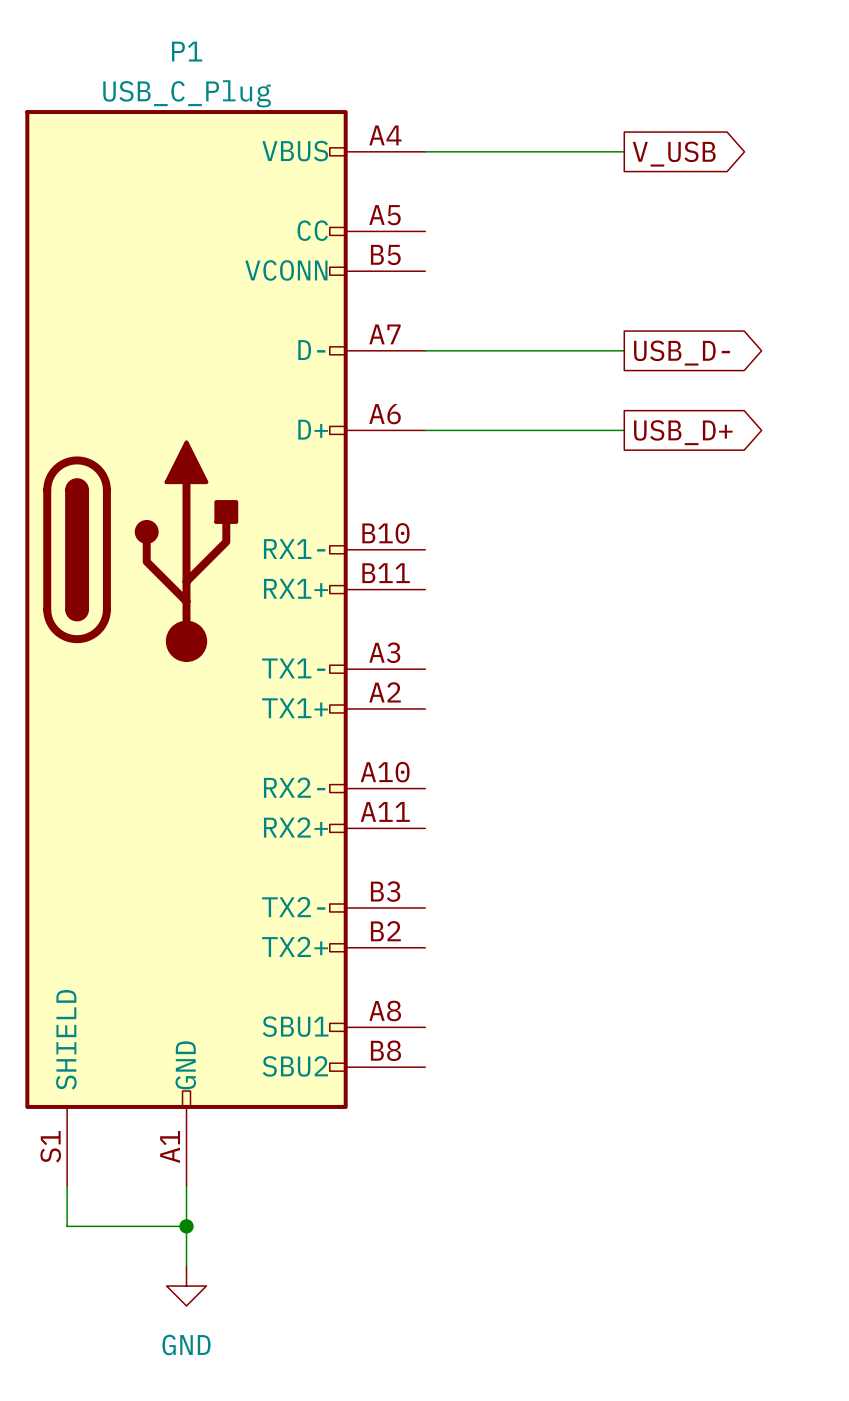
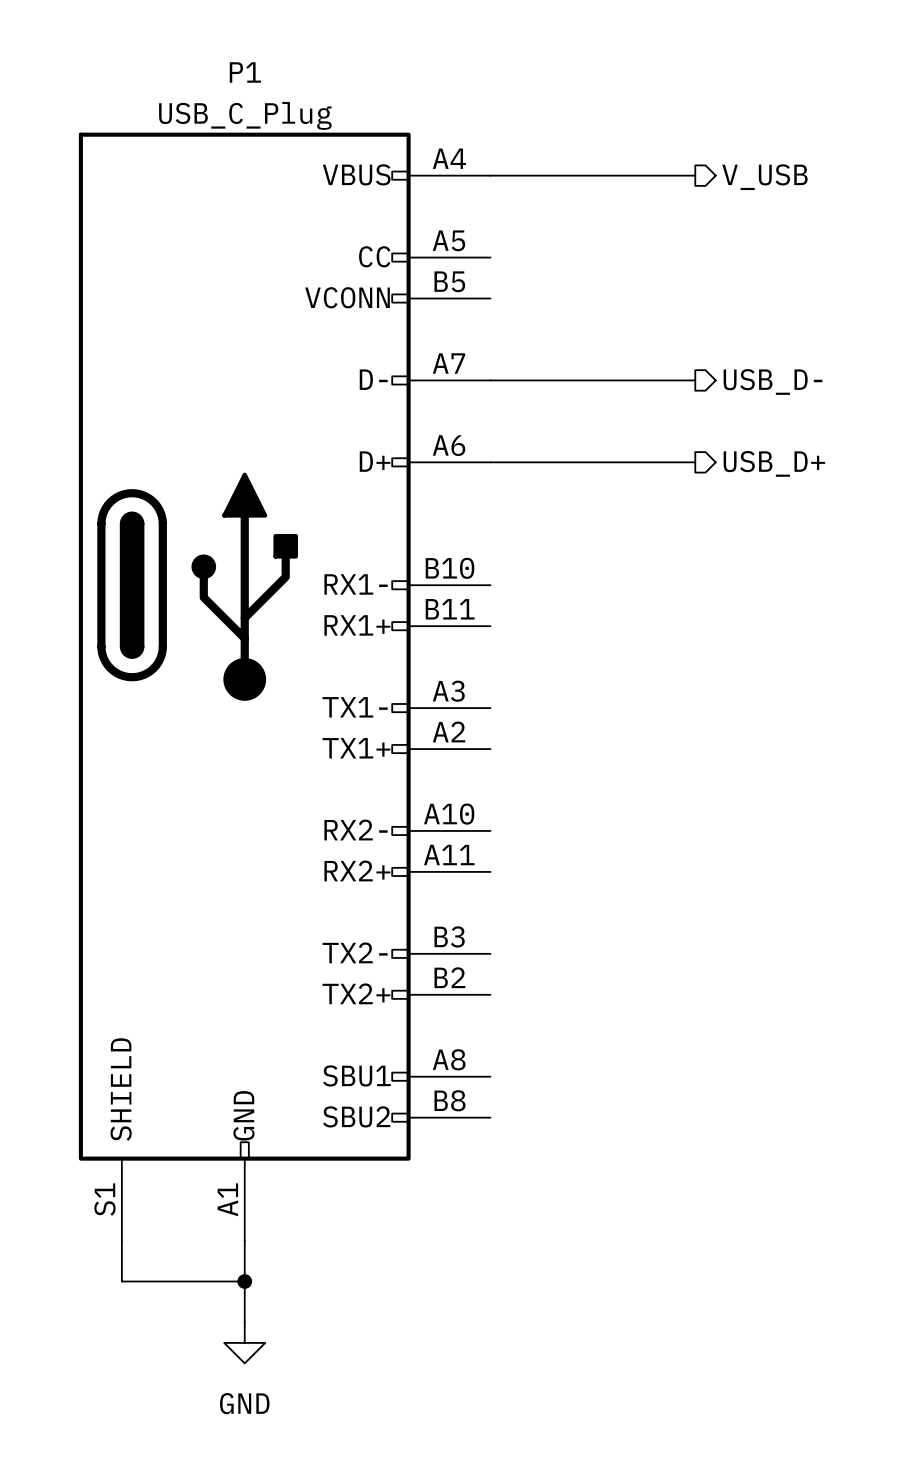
hierarchical label: none -> V_USB (764, 177)
global label: V_USB (674, 154) -> none
hierarchical label: none -> USB_D- (773, 381)
global label: USB_D- (681, 353) -> none
hierarchical label: none -> USB_D+ (774, 463)
global label: USB_D+ (683, 432) -> none

